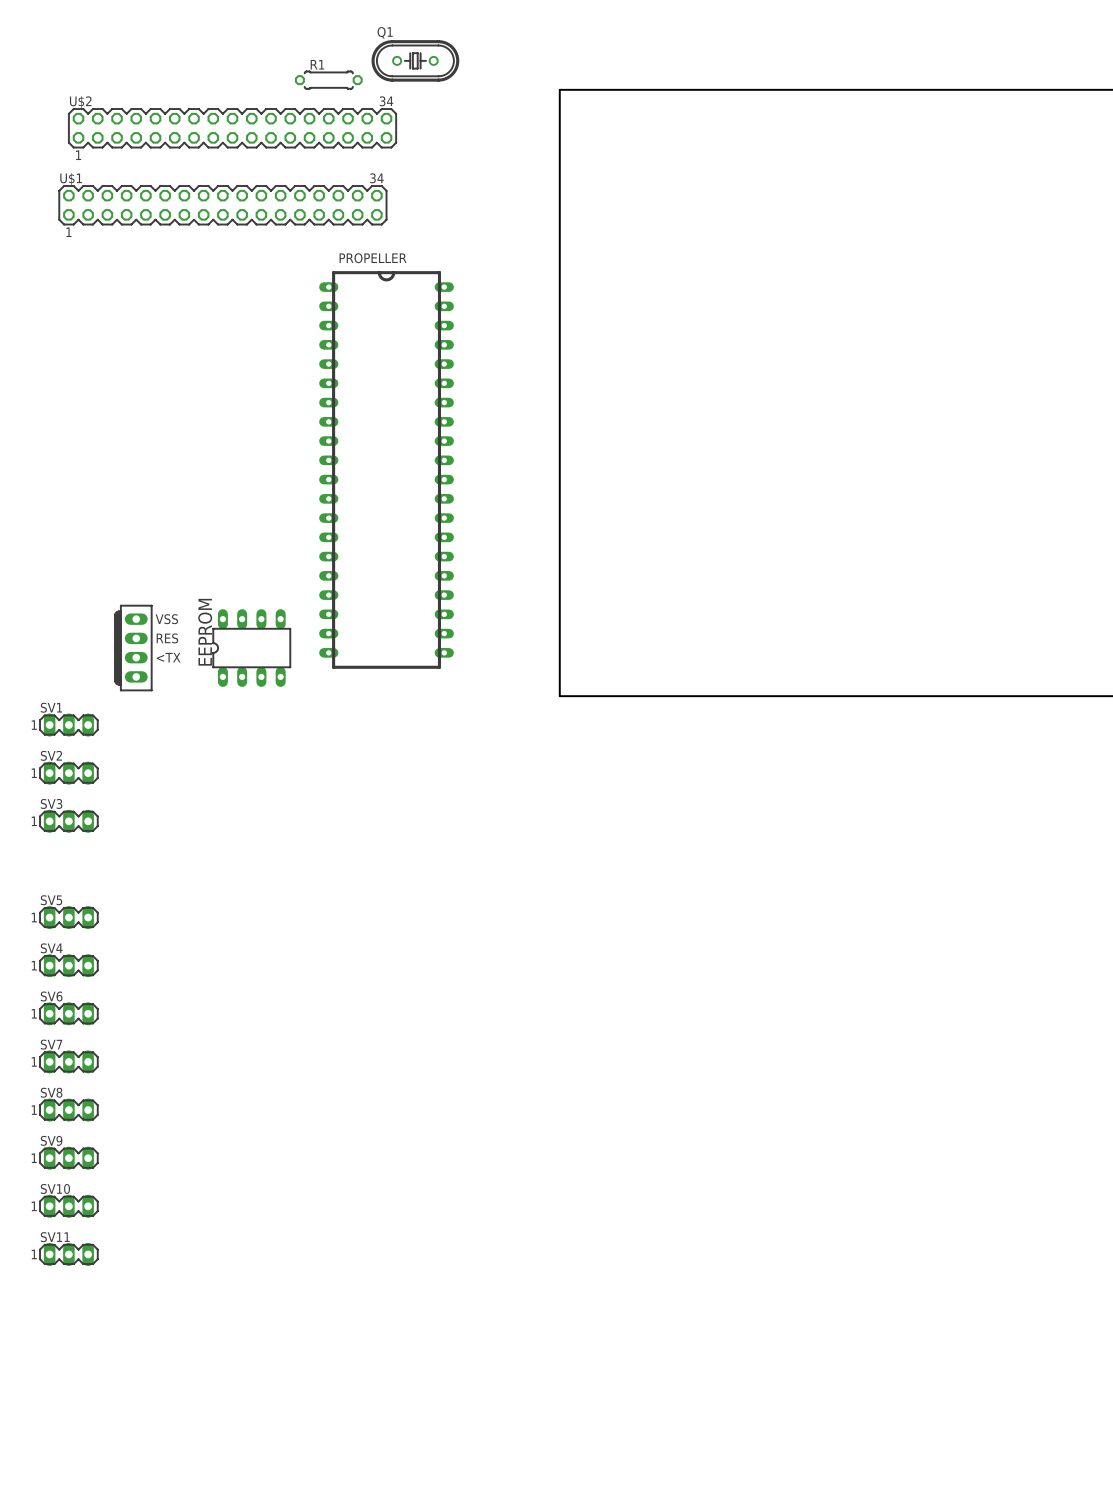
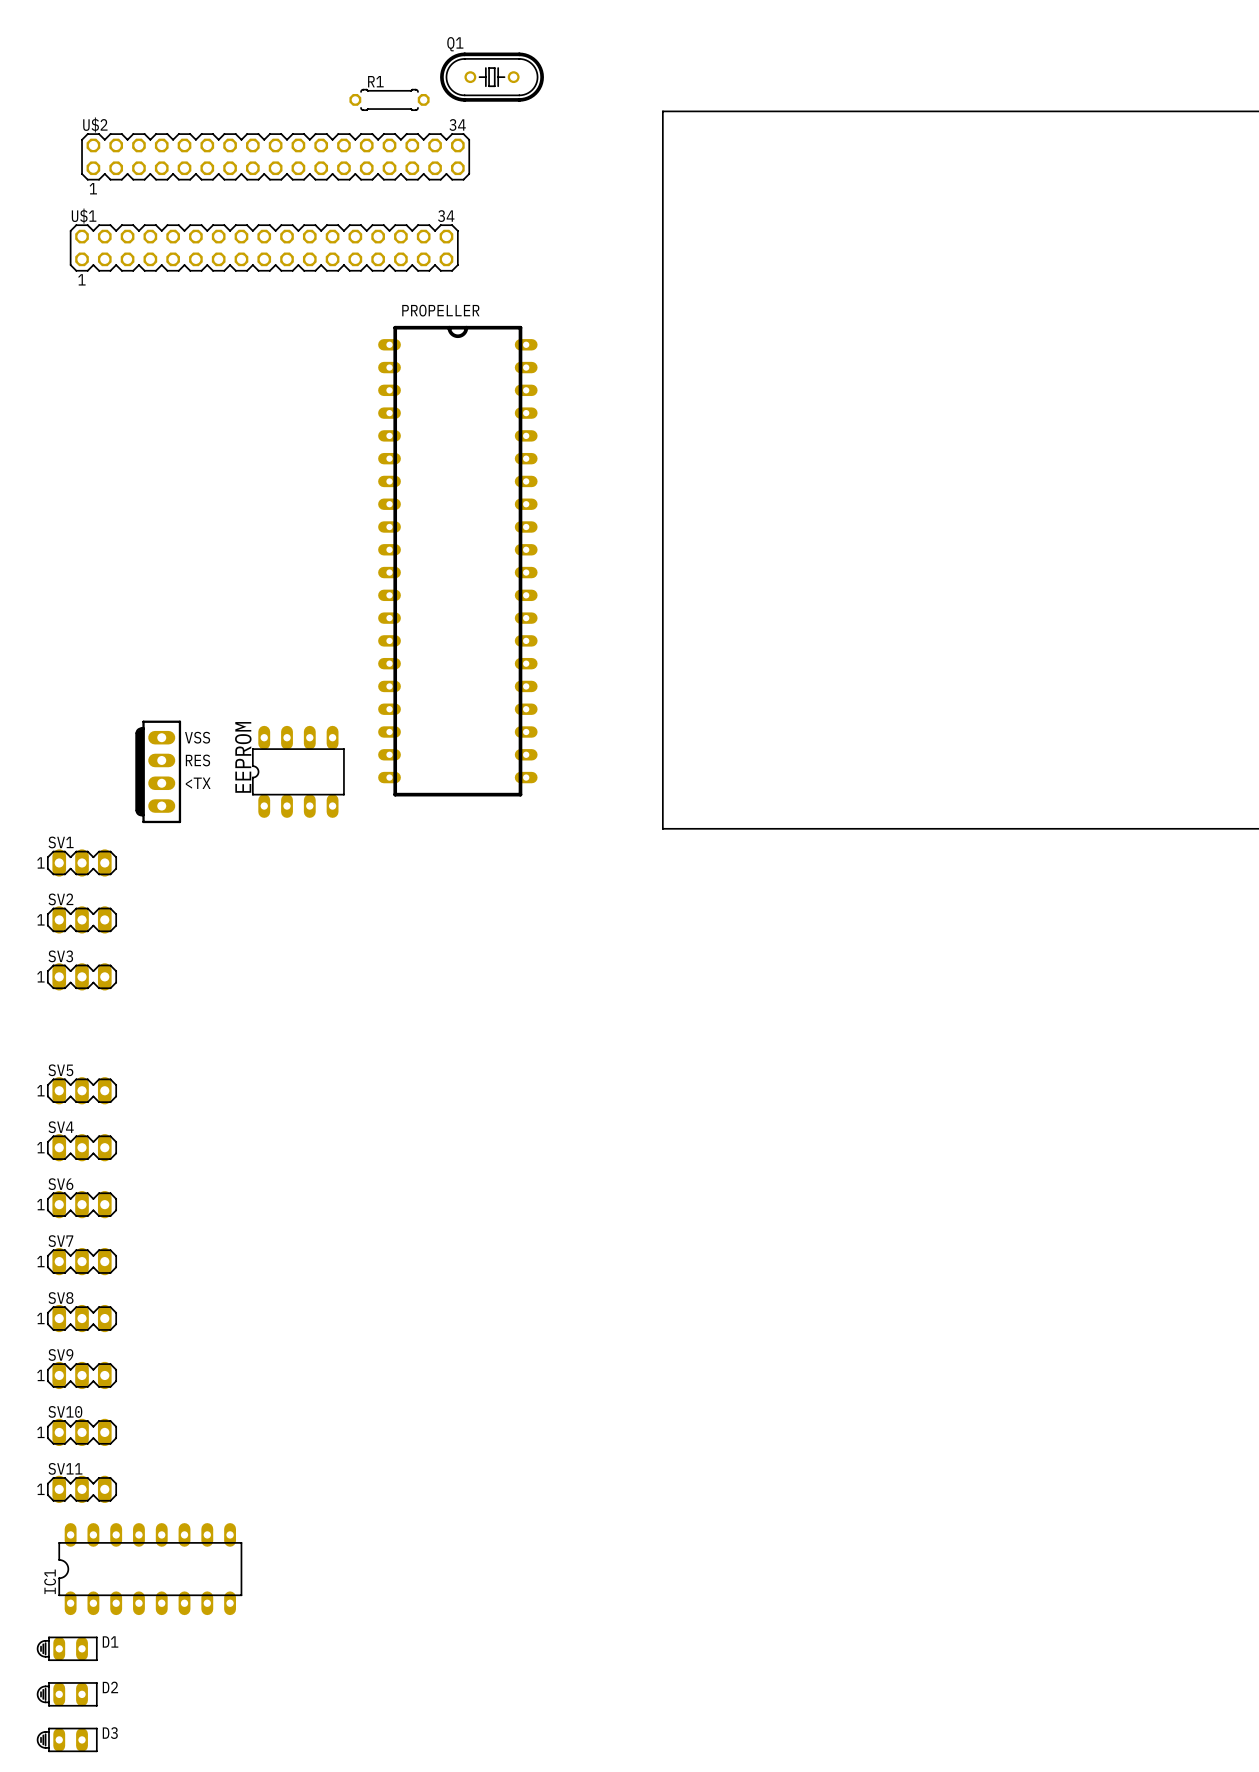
IC1: none -> (150, 1569)
D1: none -> (67, 1648)
D2: none -> (67, 1694)
D3: none -> (67, 1739)

